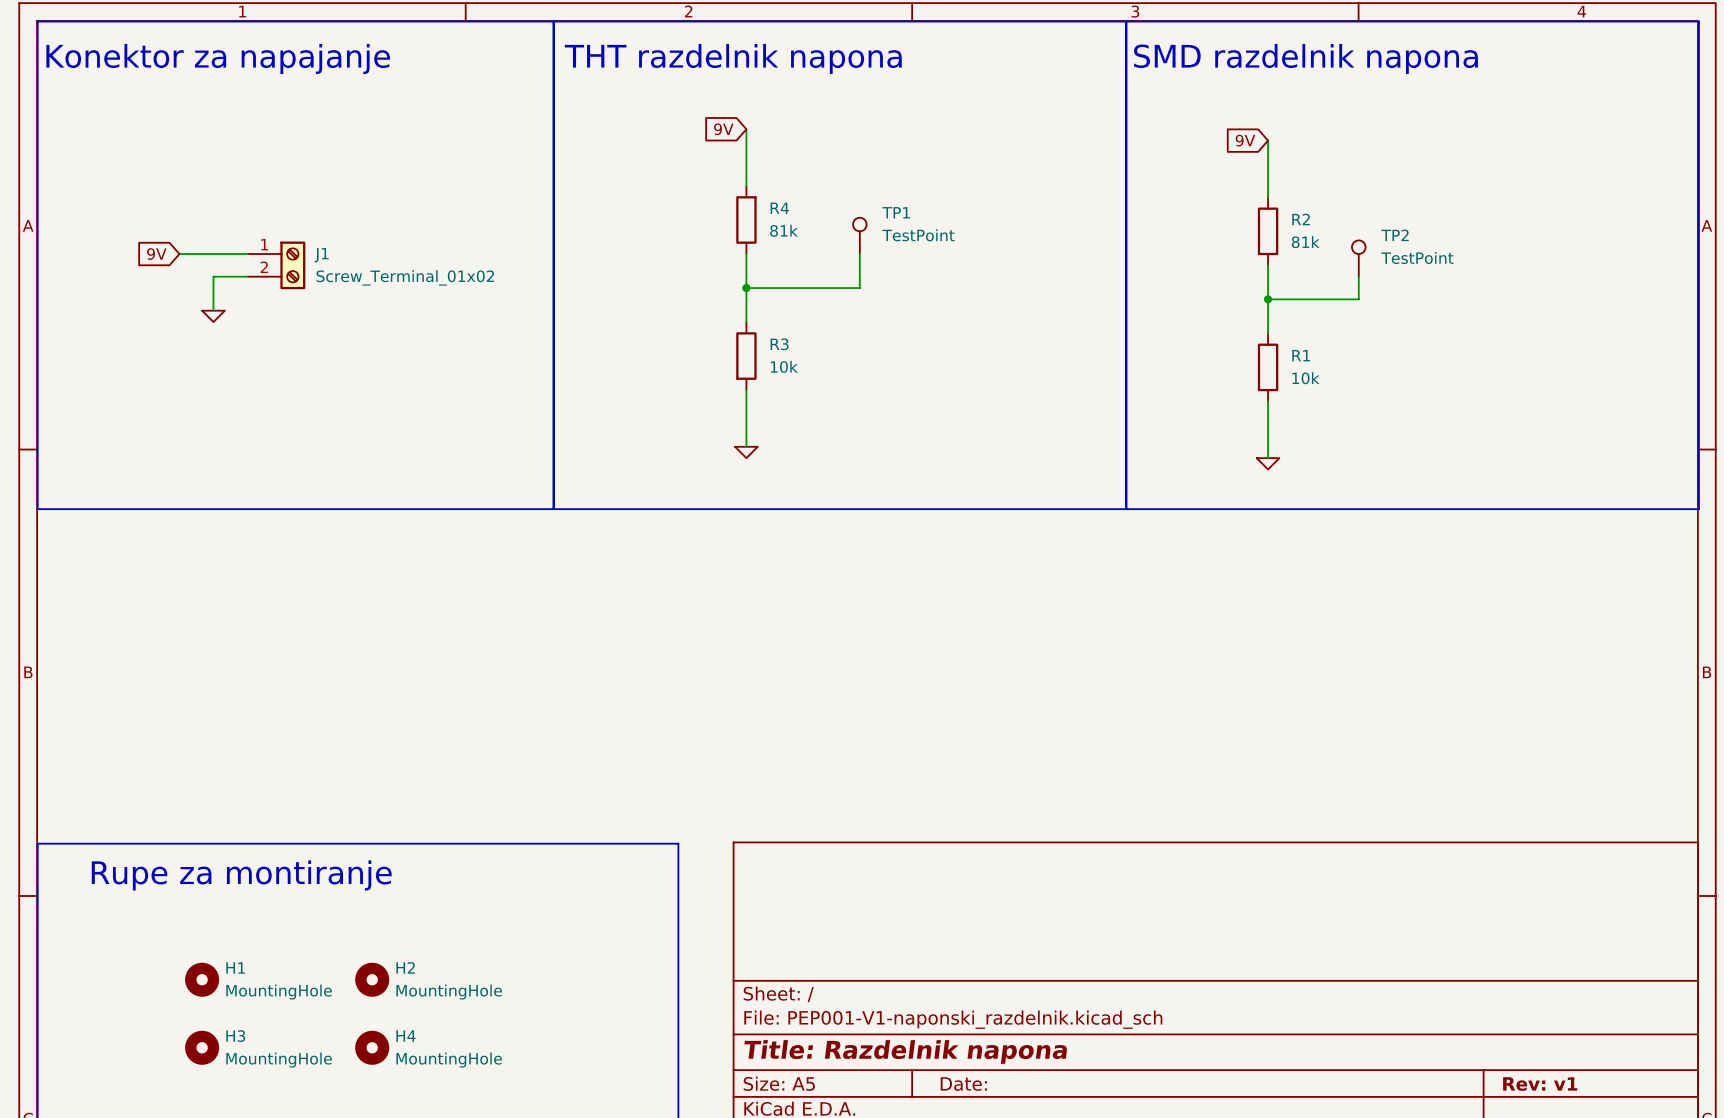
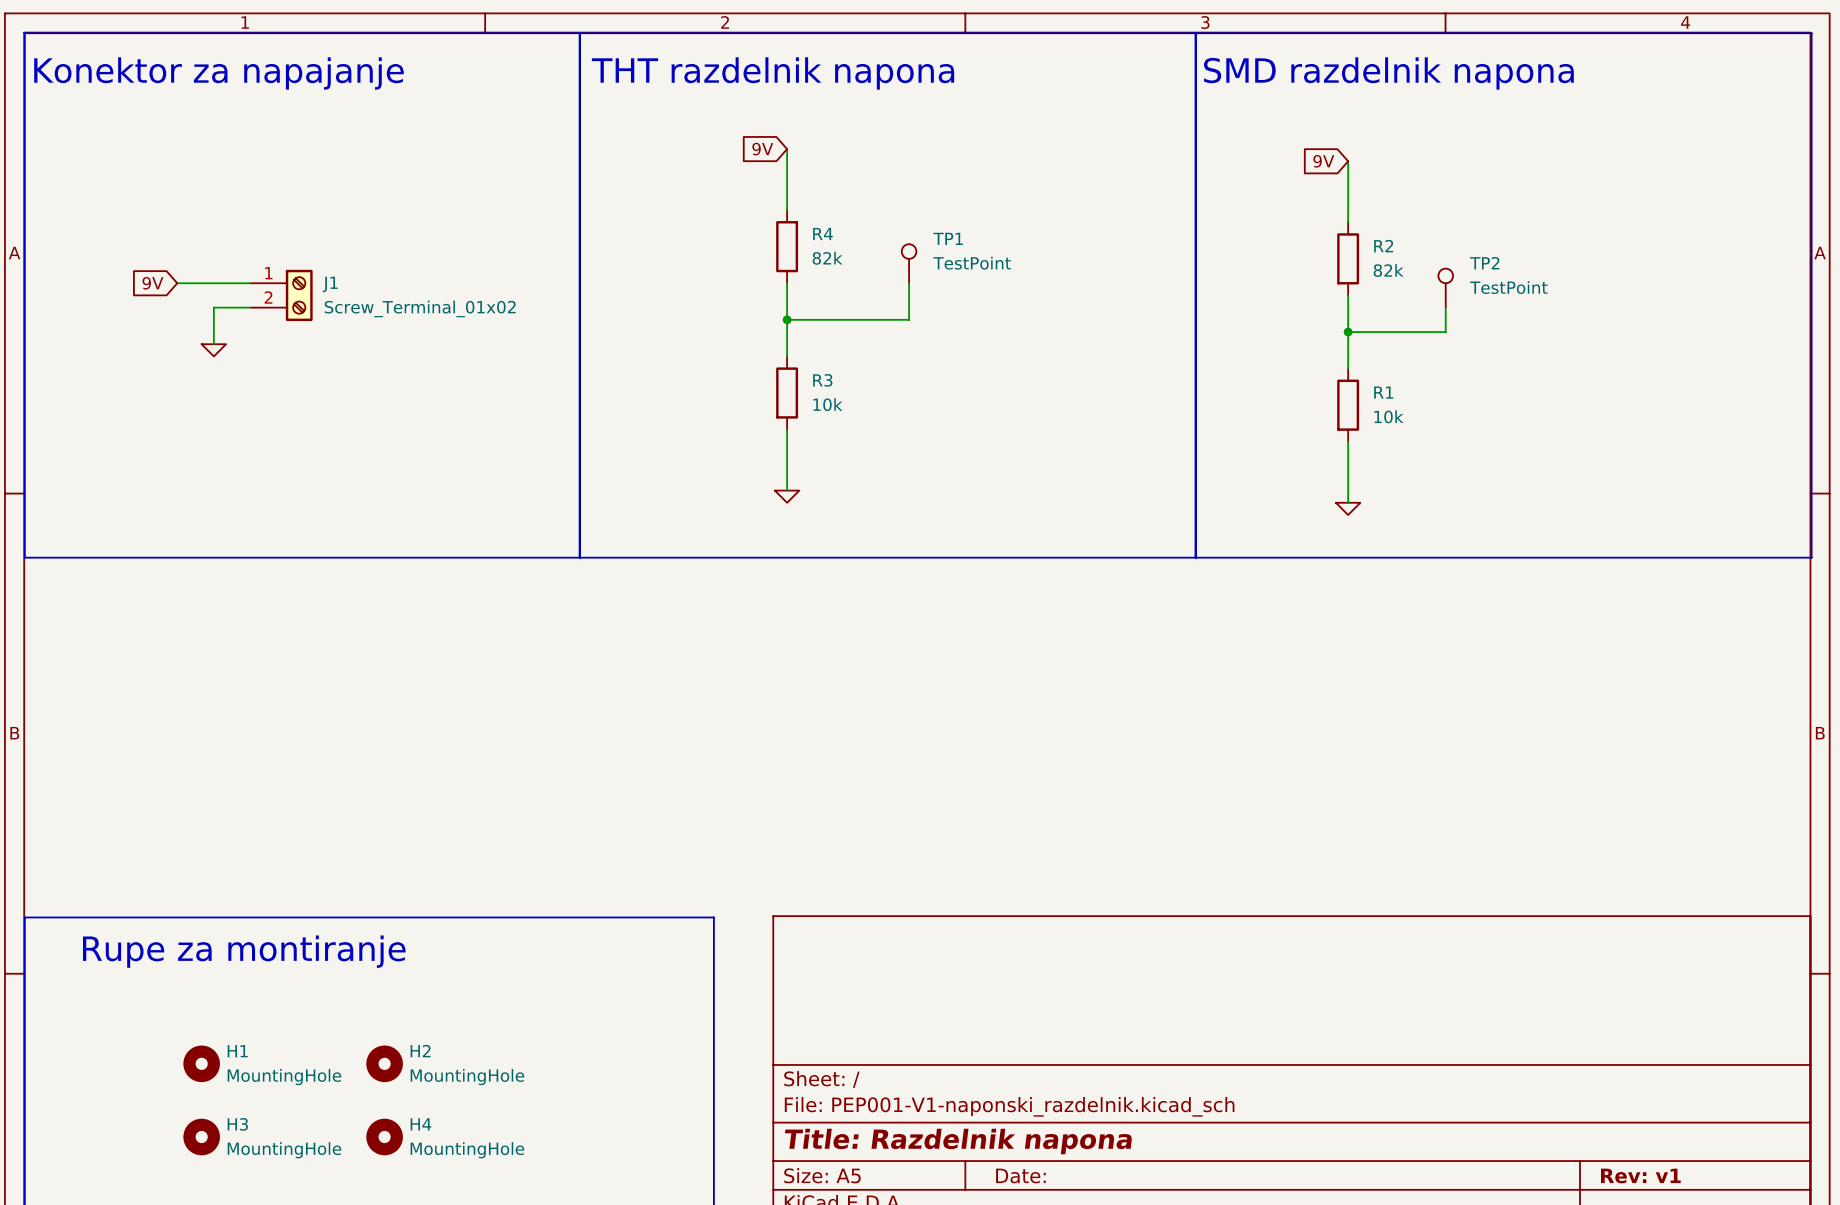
R4 value: 81k (784, 230) -> 82k (827, 258)
R2 value: 81k (1305, 242) -> 82k (1388, 270)

